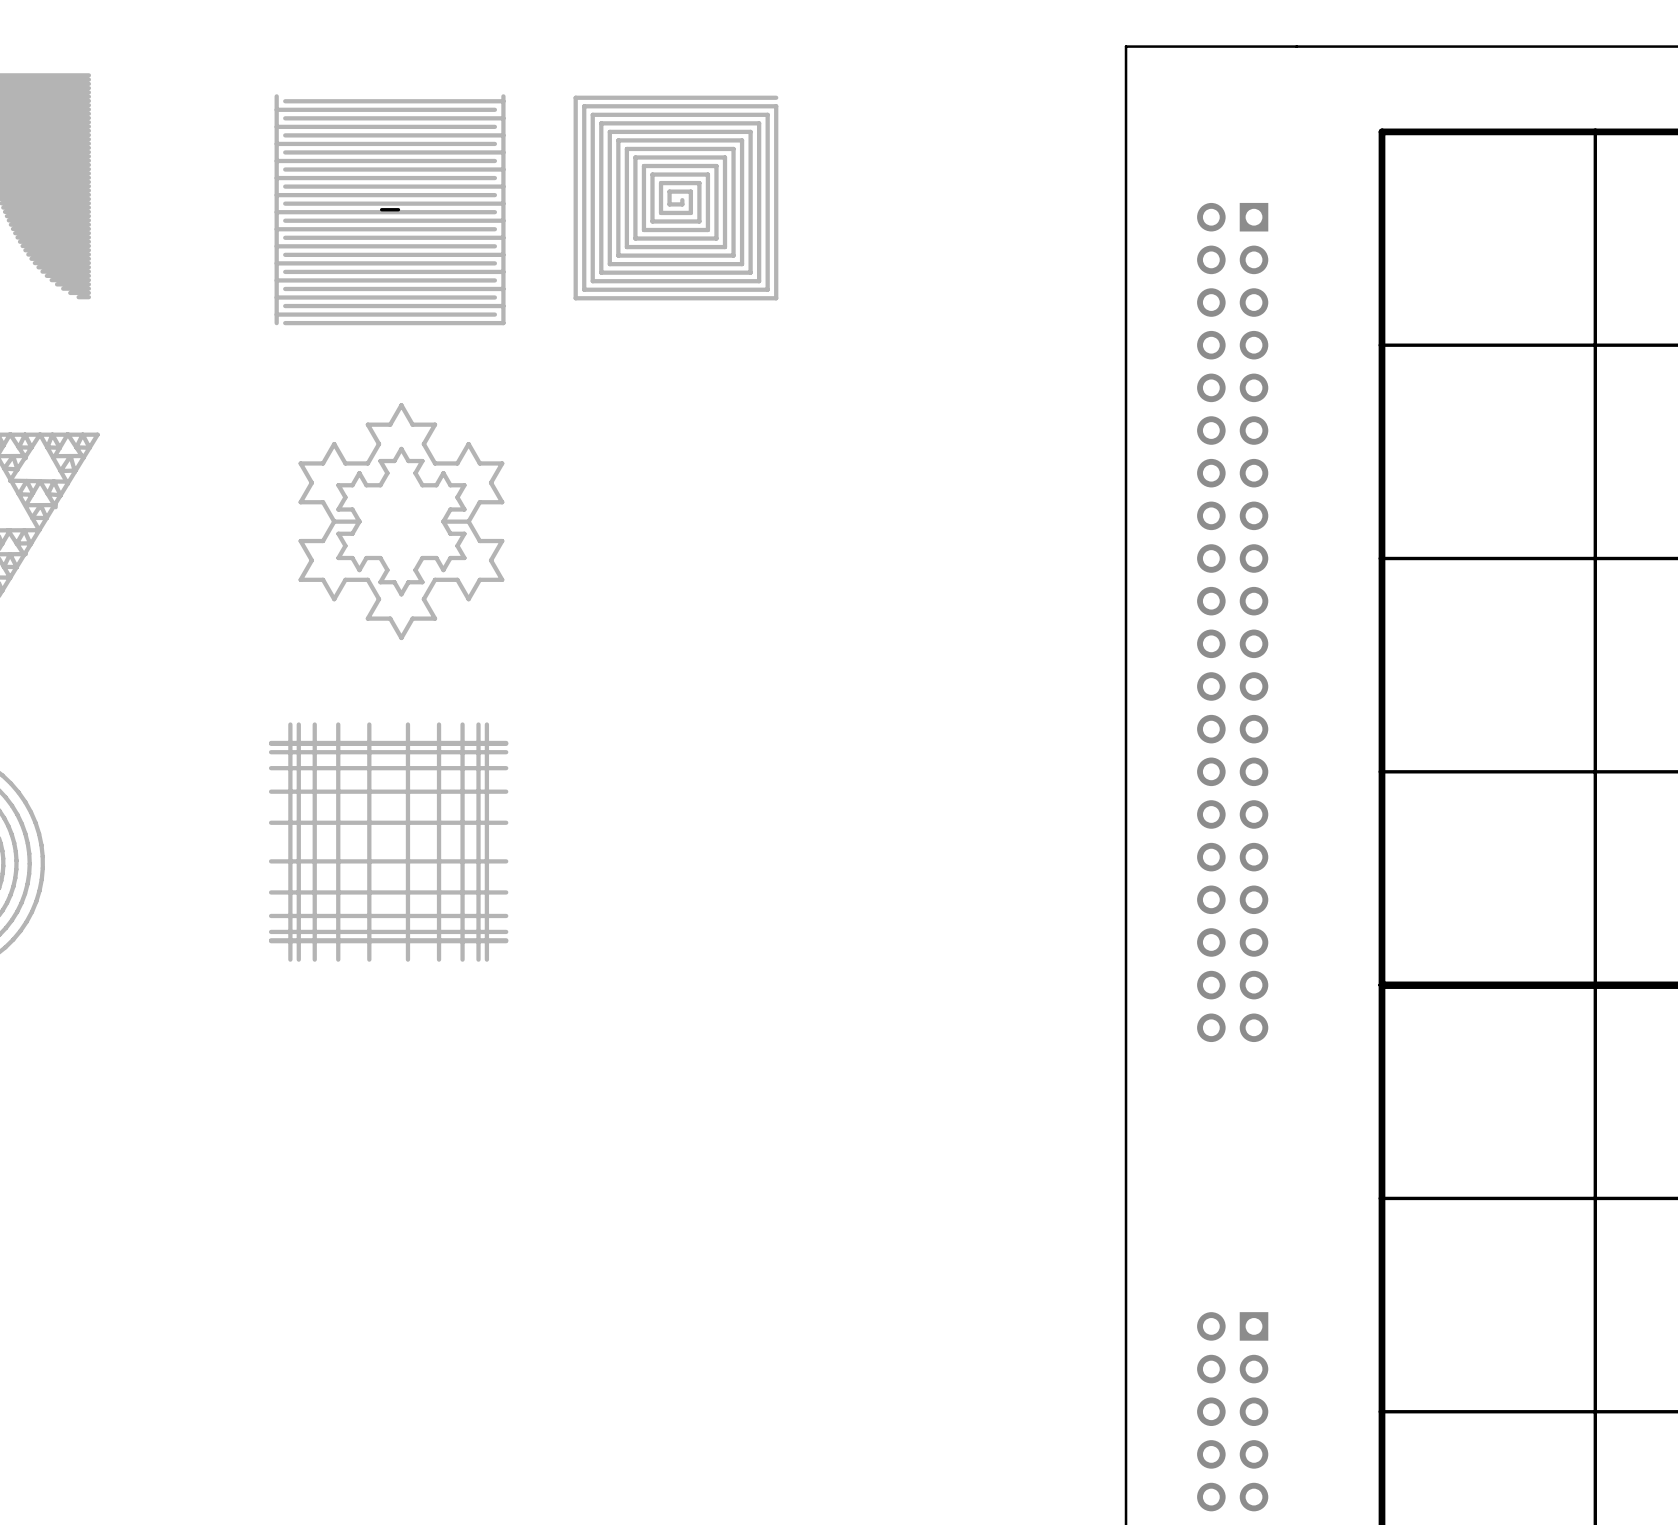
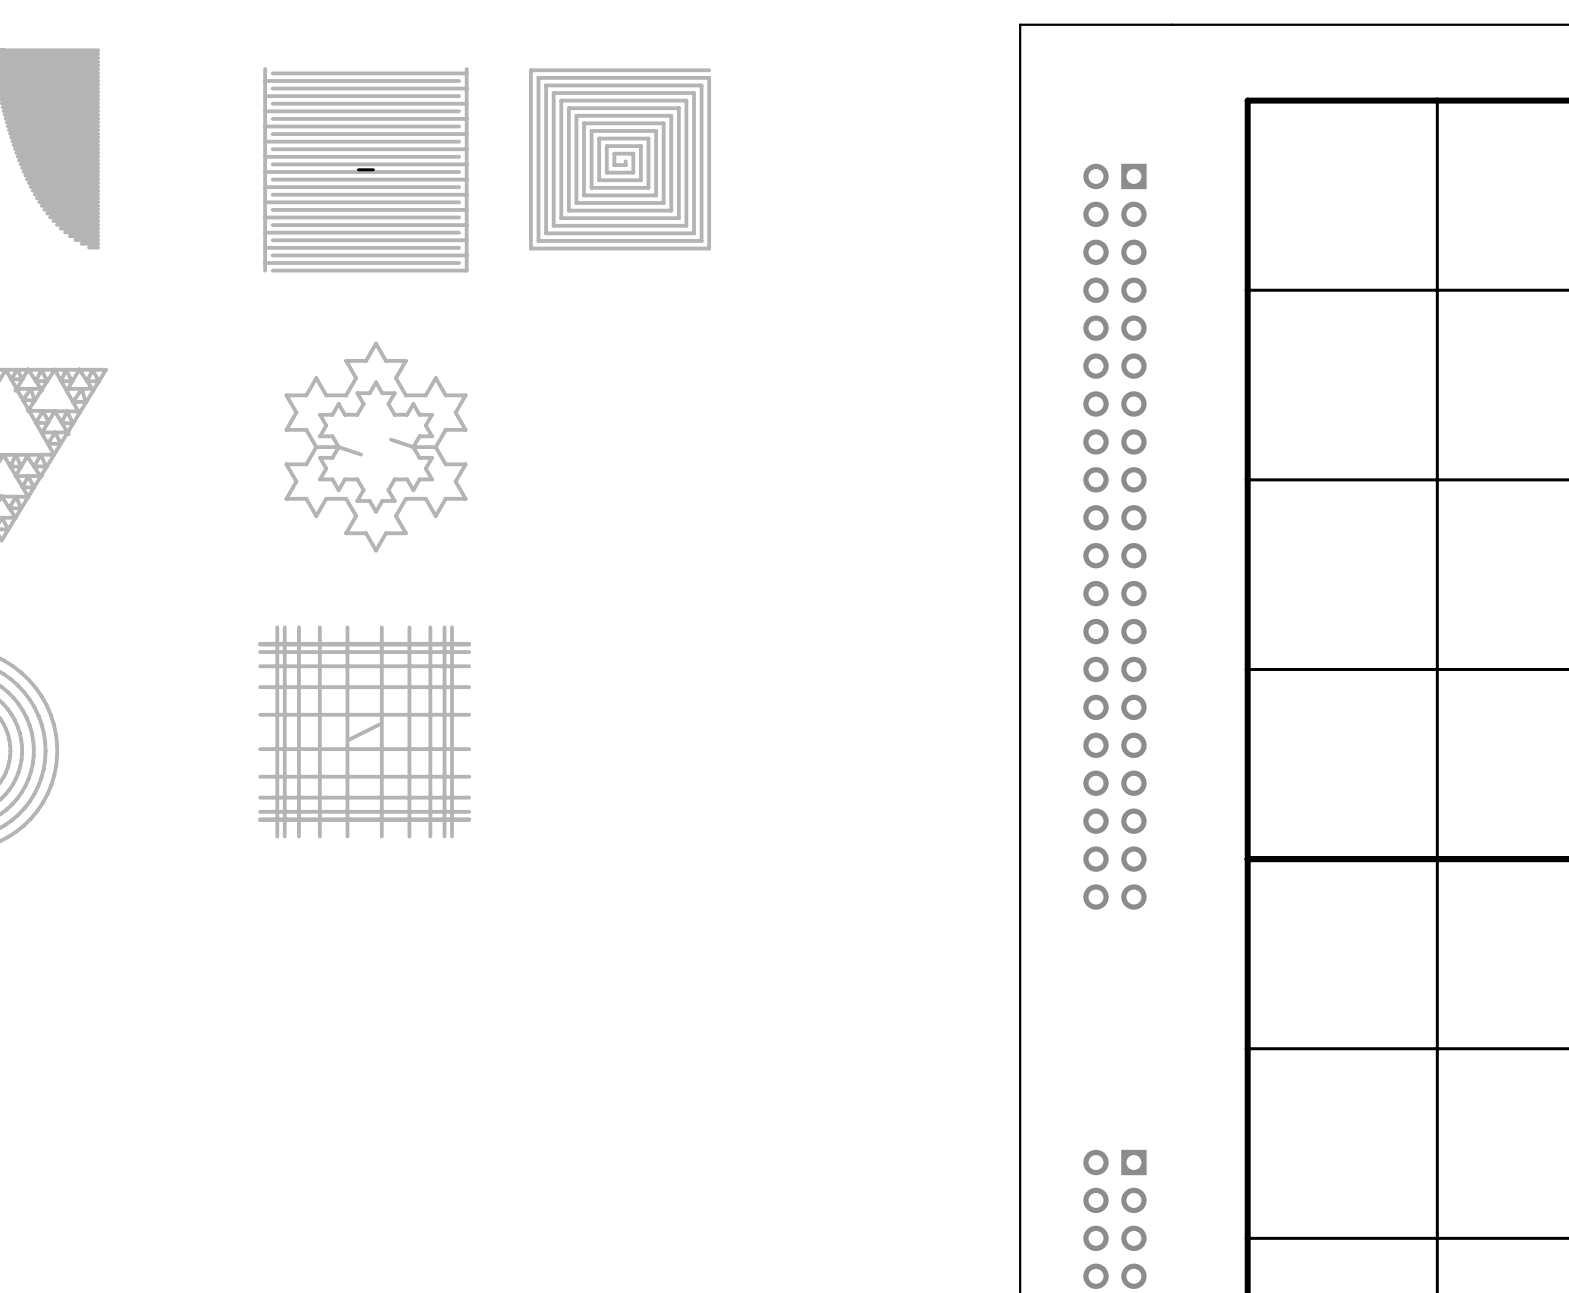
track: none -> (390, 439) (413, 447)
track: none -> (338, 447) (361, 454)
track: none -> (379, 724) (349, 739)

